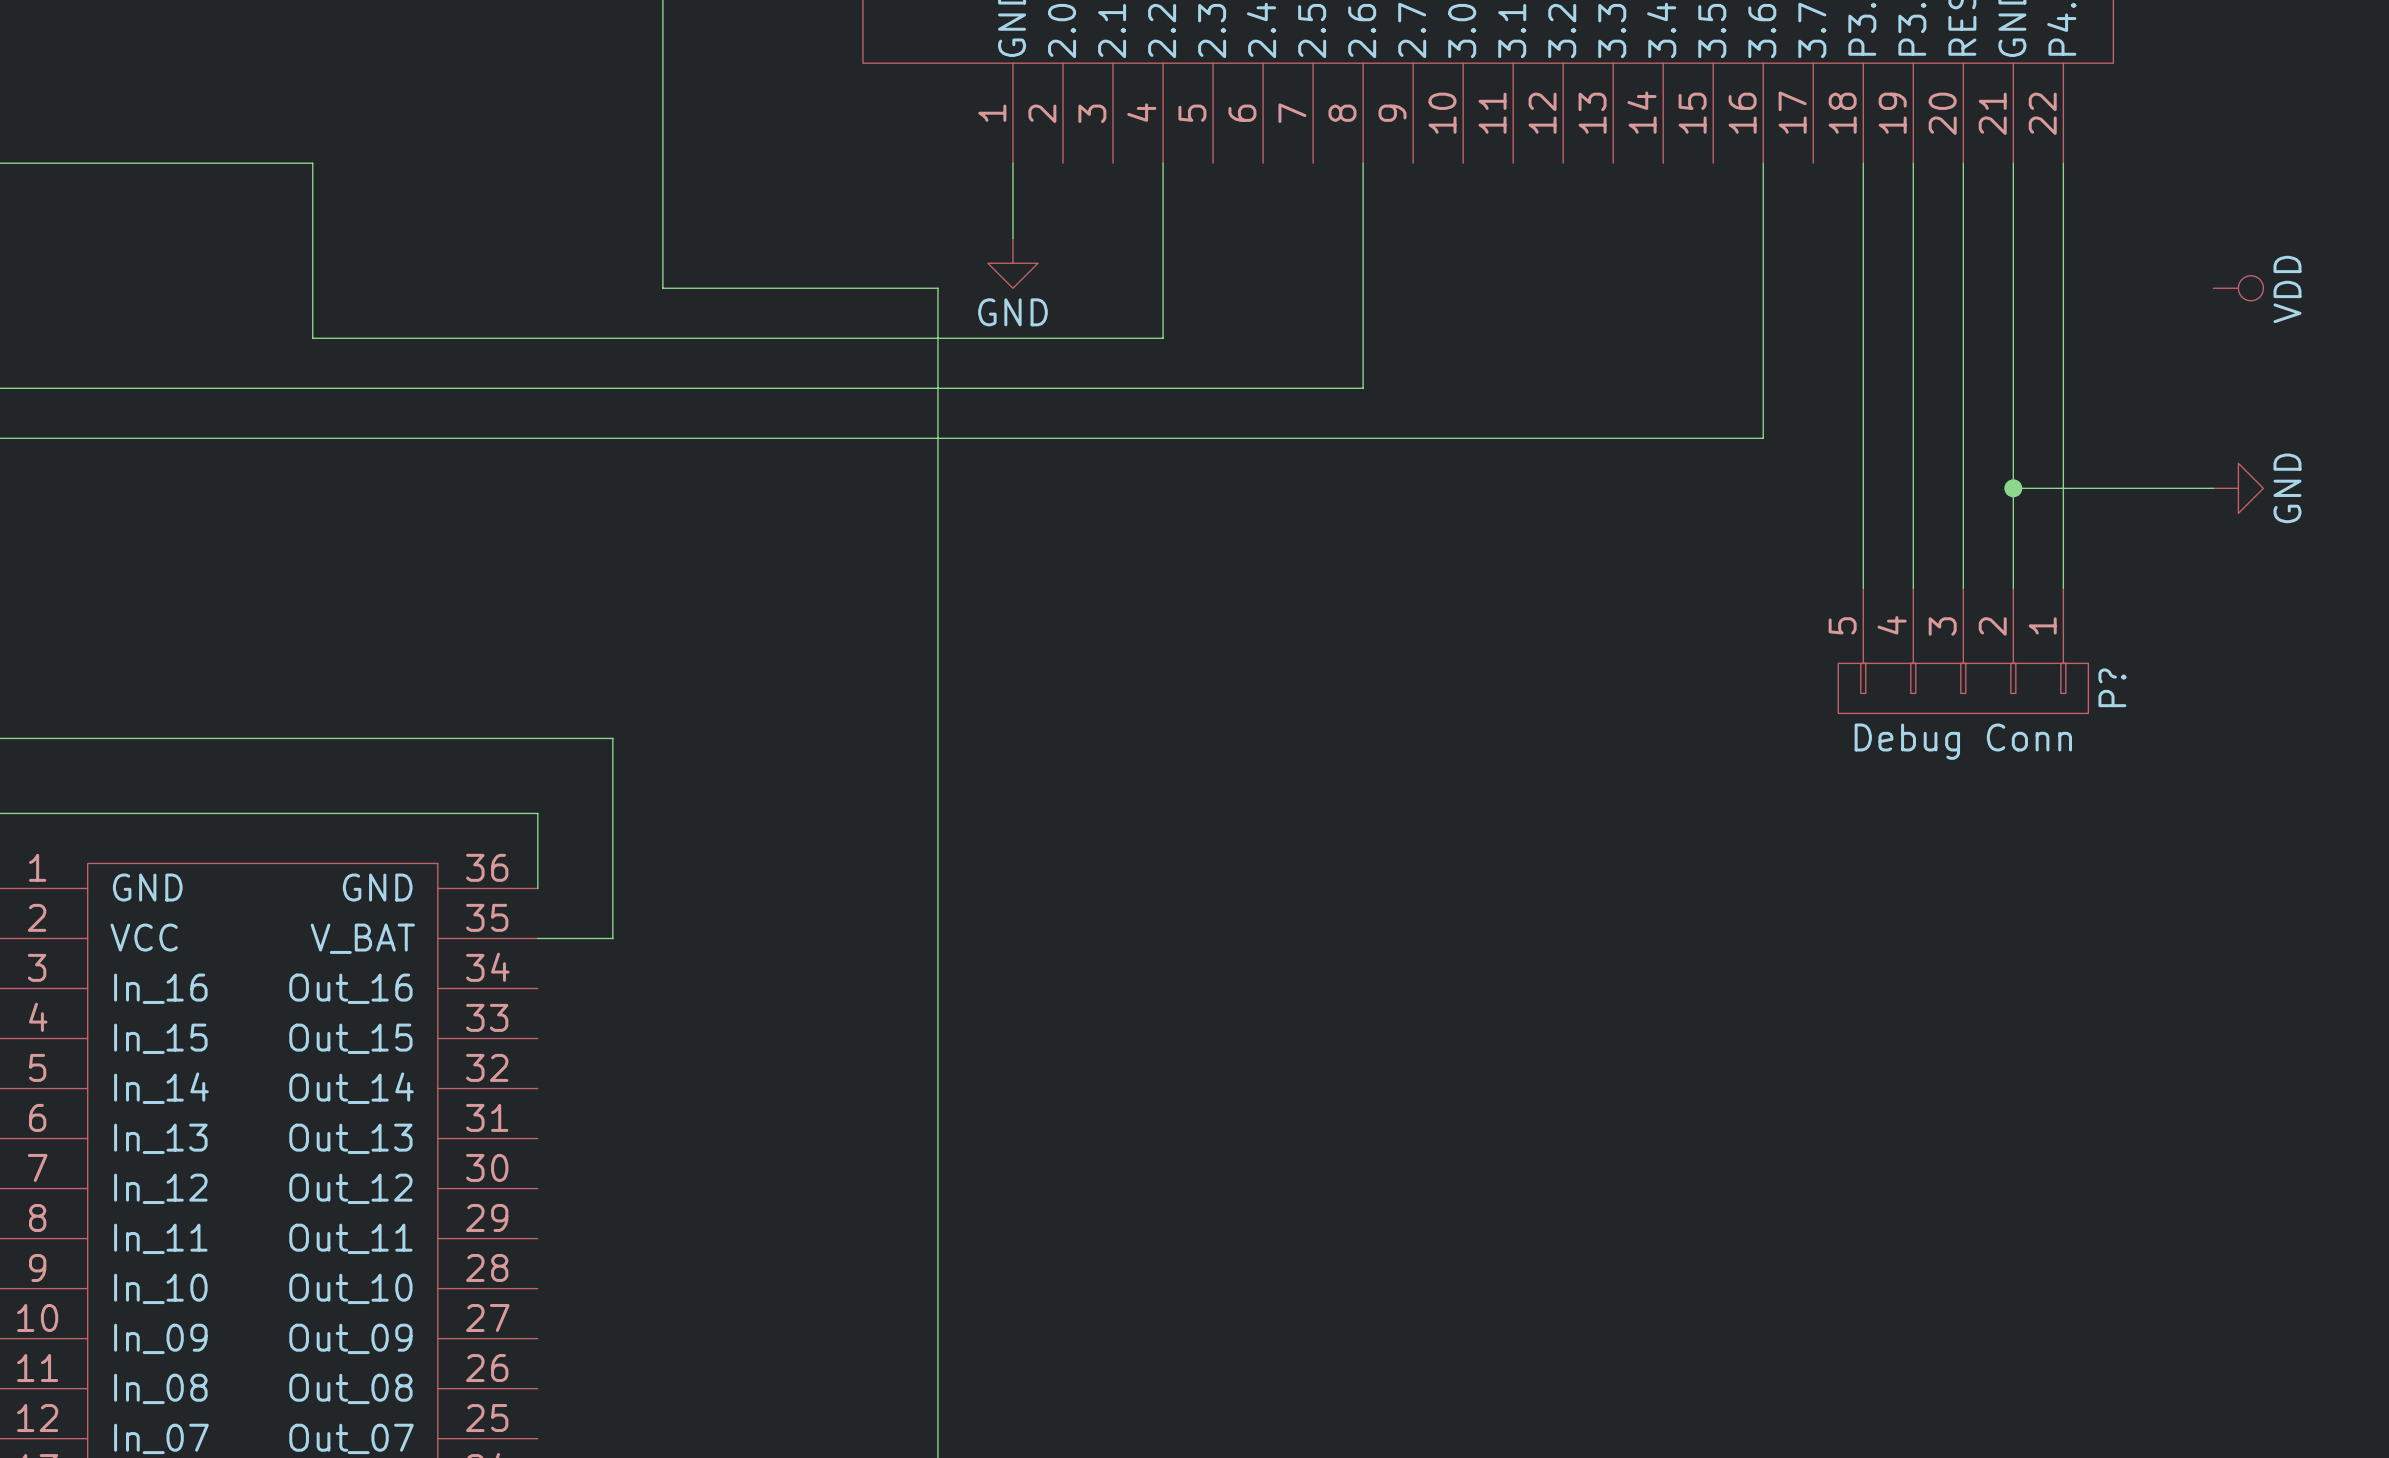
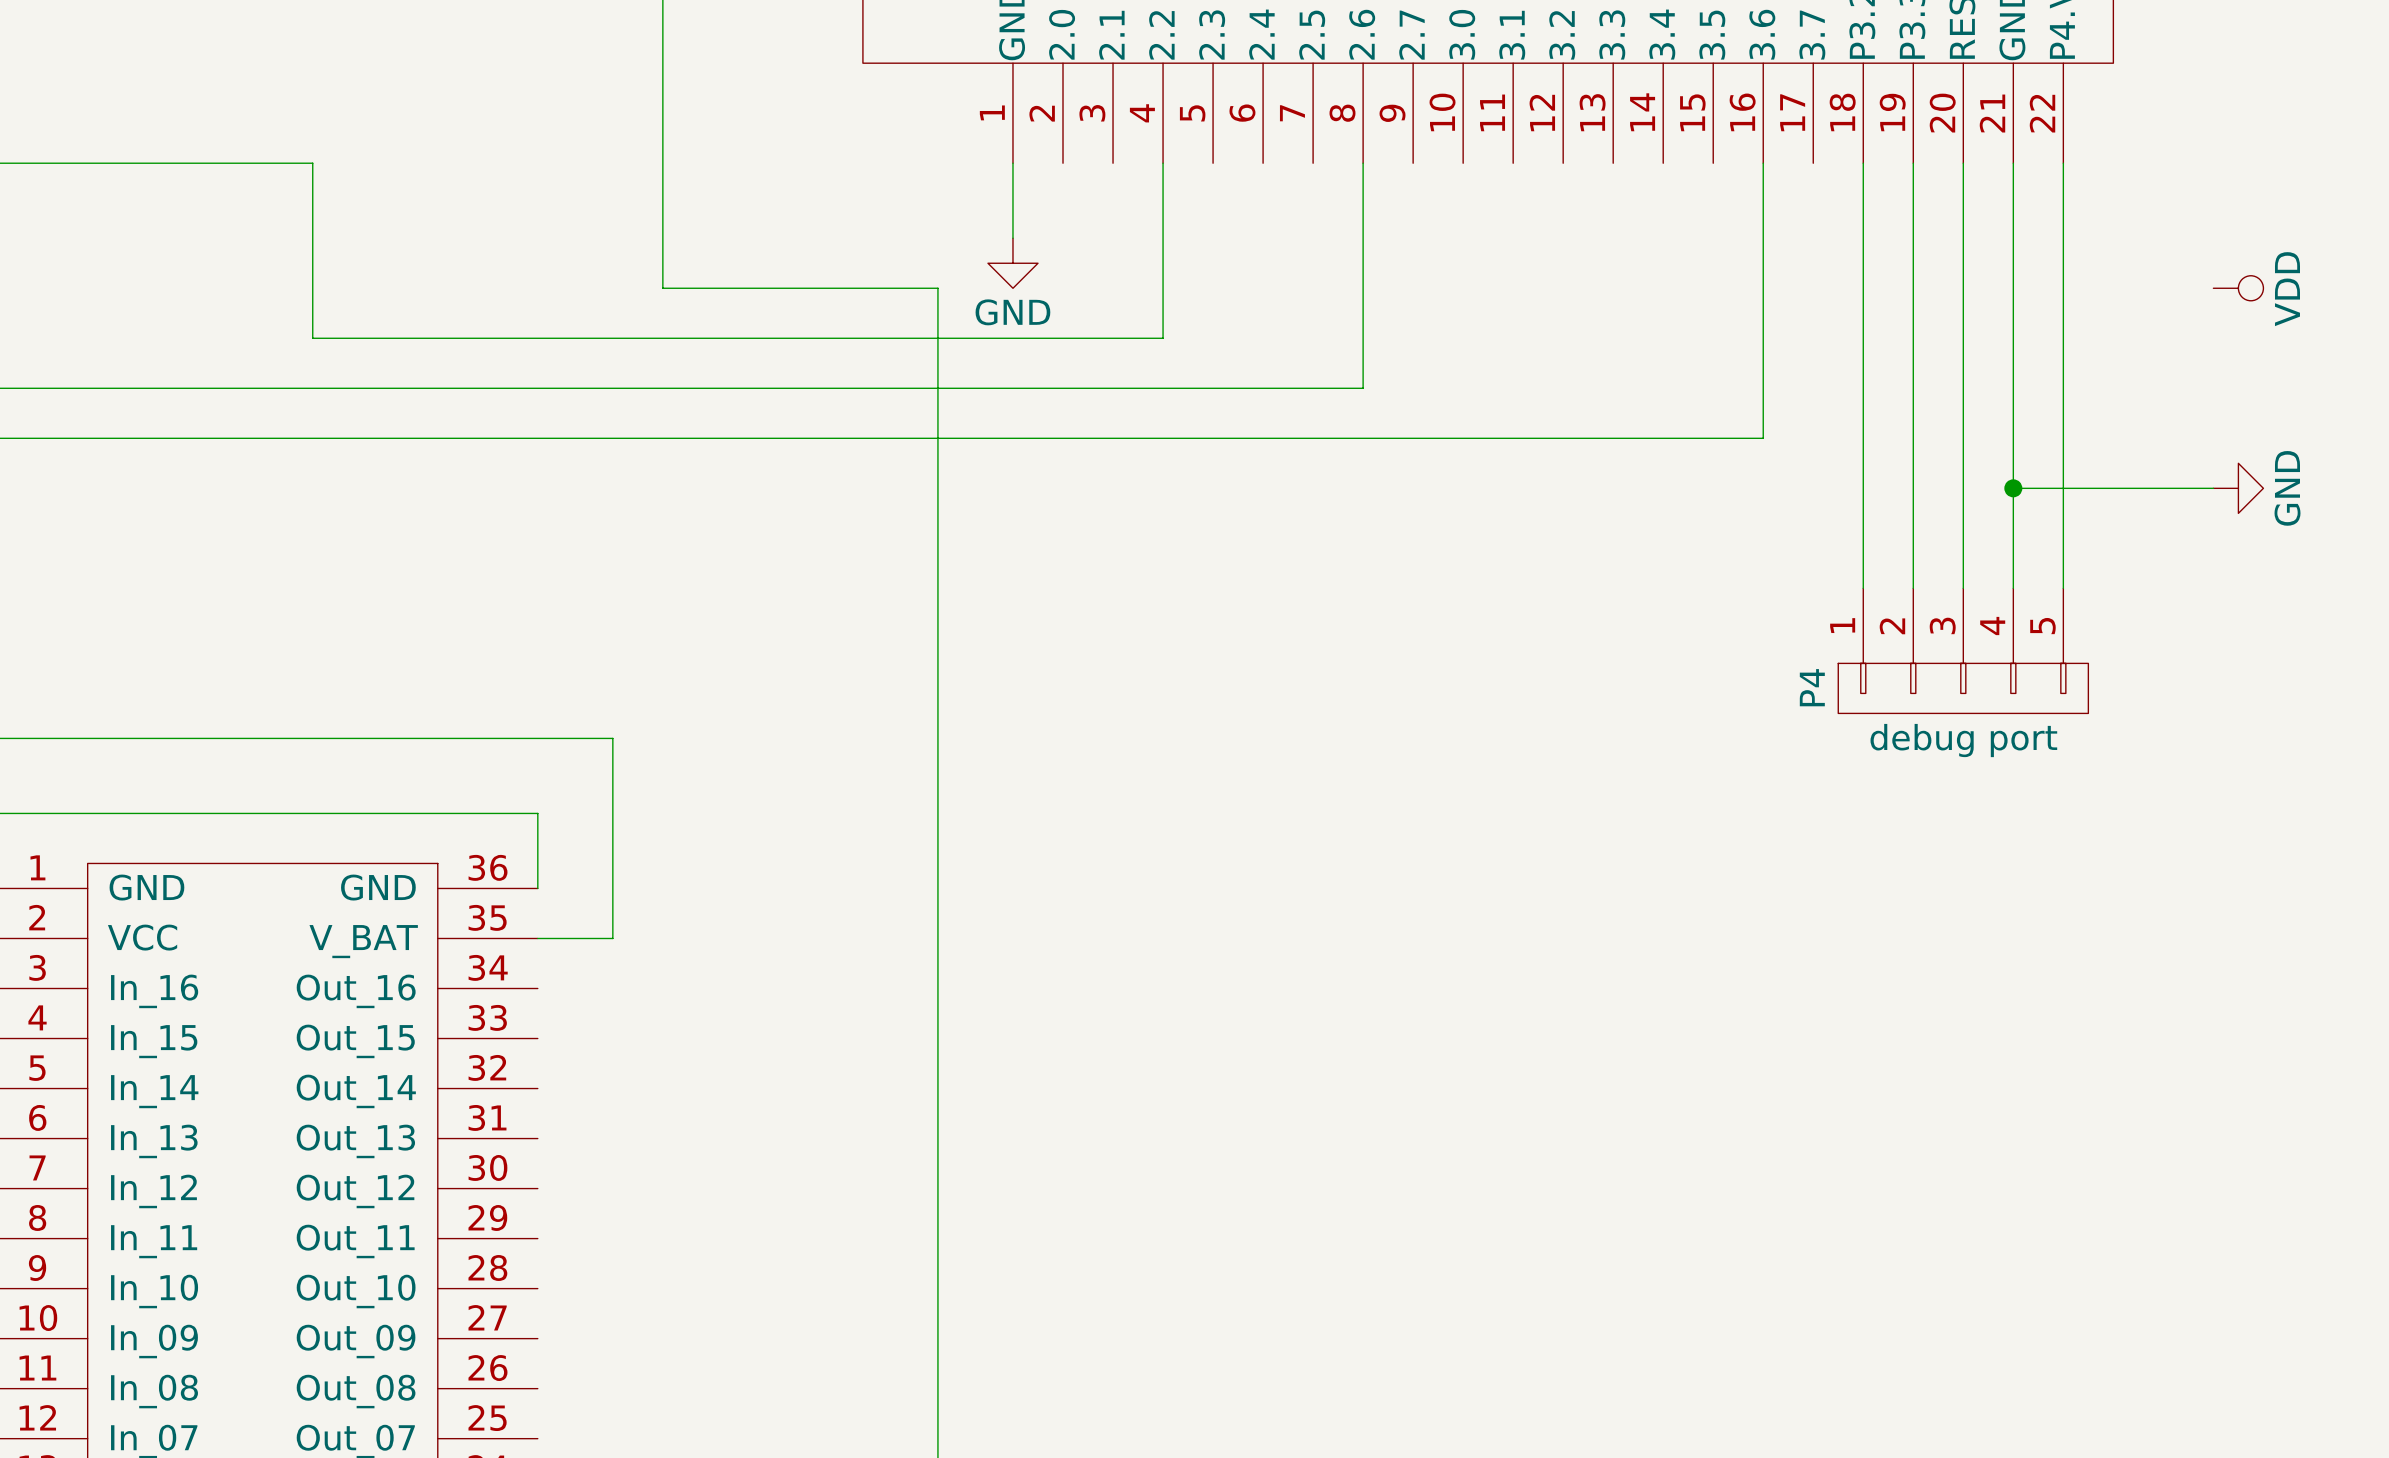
P? name: P? (2112, 687) -> P4 (1812, 687)
P? flip: as is (1963, 688) -> left-right (1963, 688)
P? value: Debug Conn (1963, 741) -> debug port (1963, 740)

